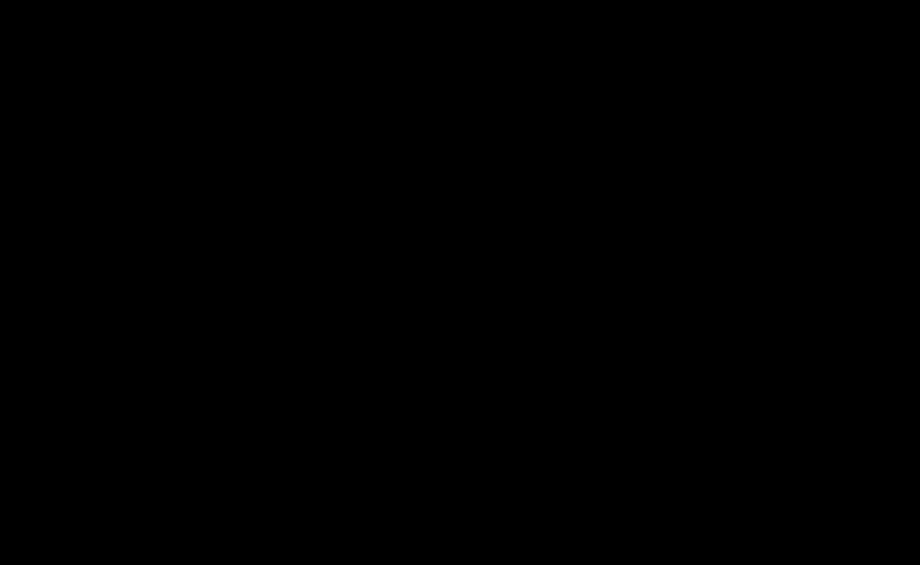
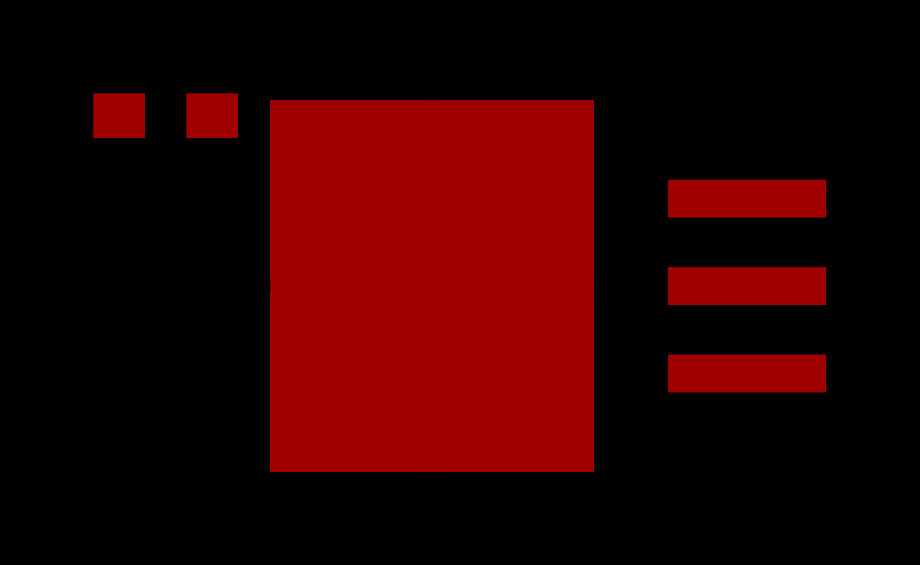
part: none -> (165, 115)
part: none -> (548, 286)

